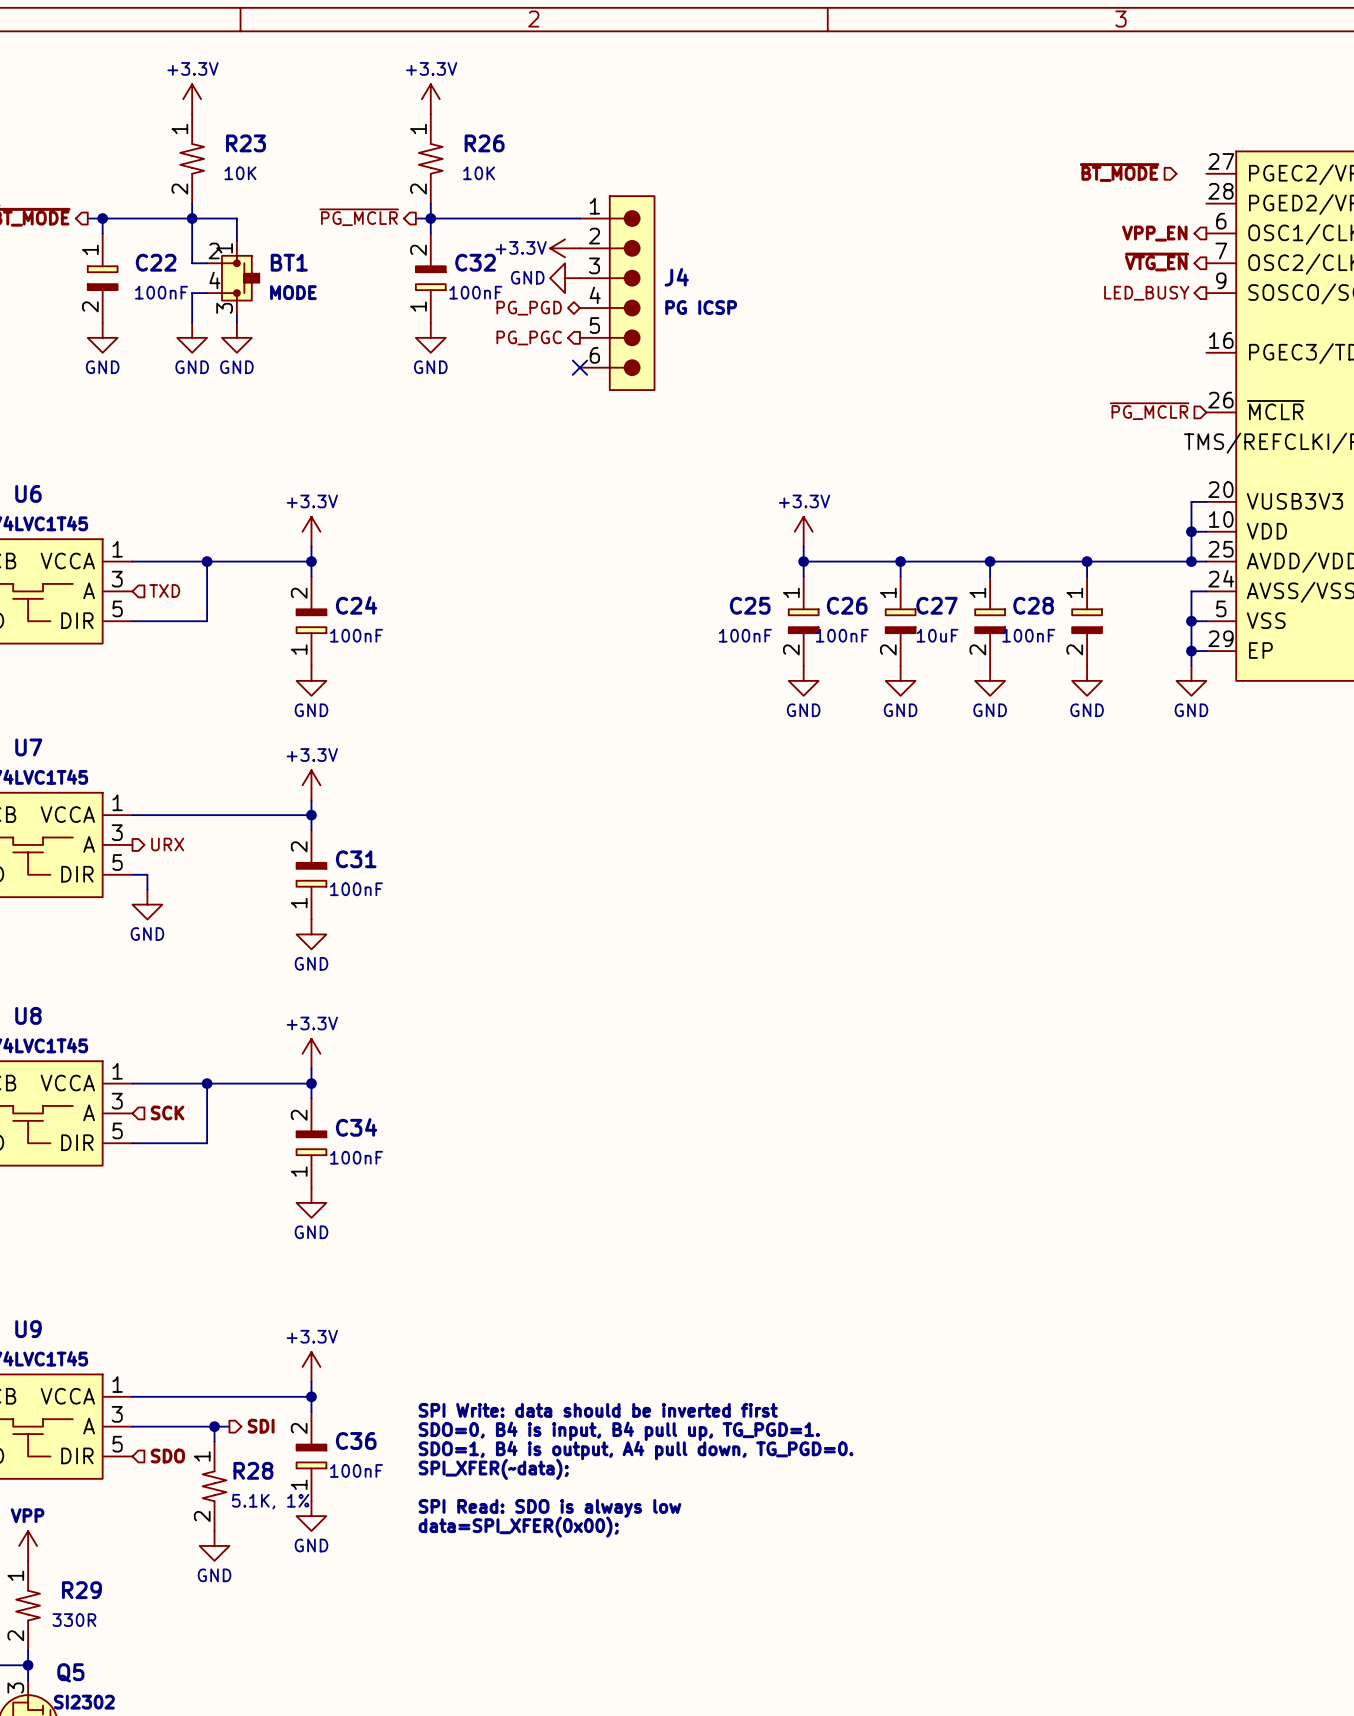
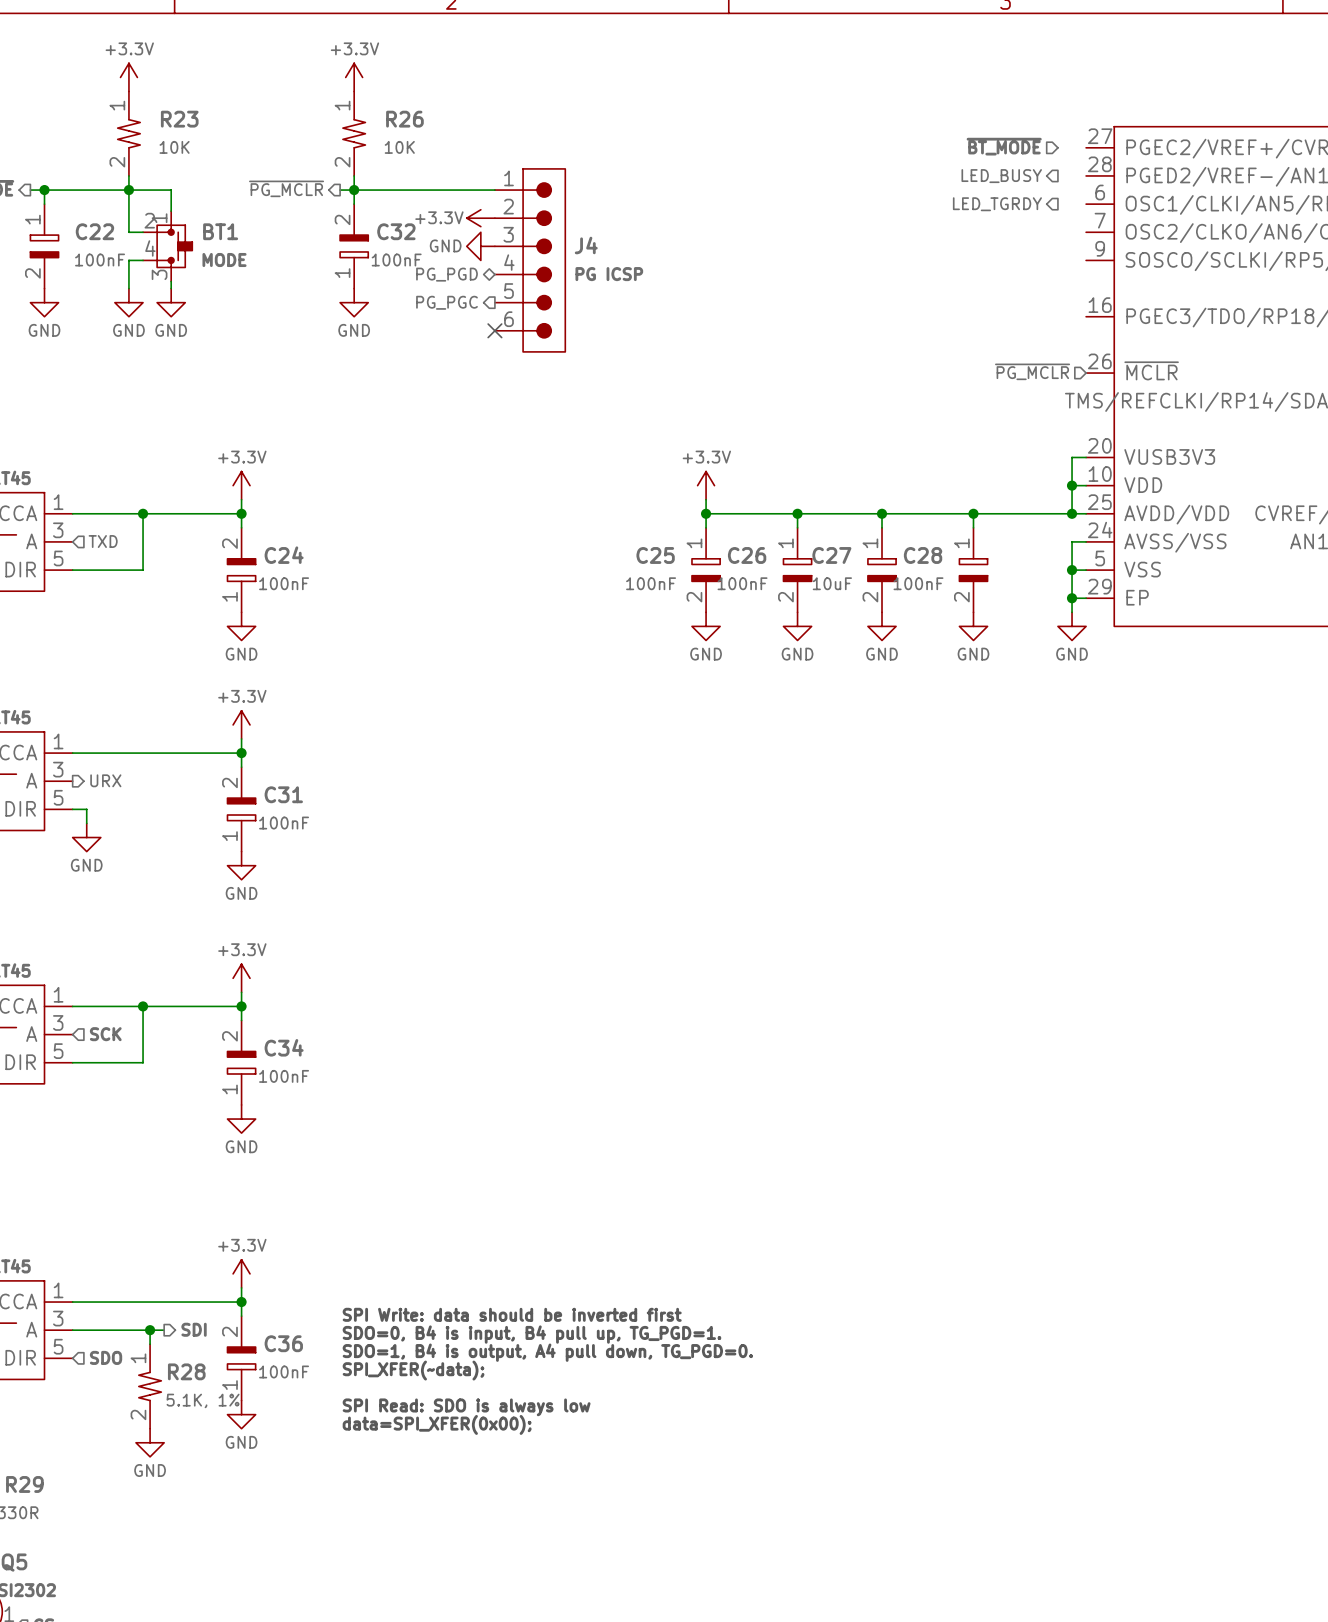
hierarchical label: none -> LED_TGRDY (997, 204)
hierarchical label: VPP_EN (1154, 233) -> none
hierarchical label: ~{VTG_EN} (1157, 262) -> none
hierarchical label position: LED_BUSY (1146, 293) -> LED_BUSY (1001, 176)

